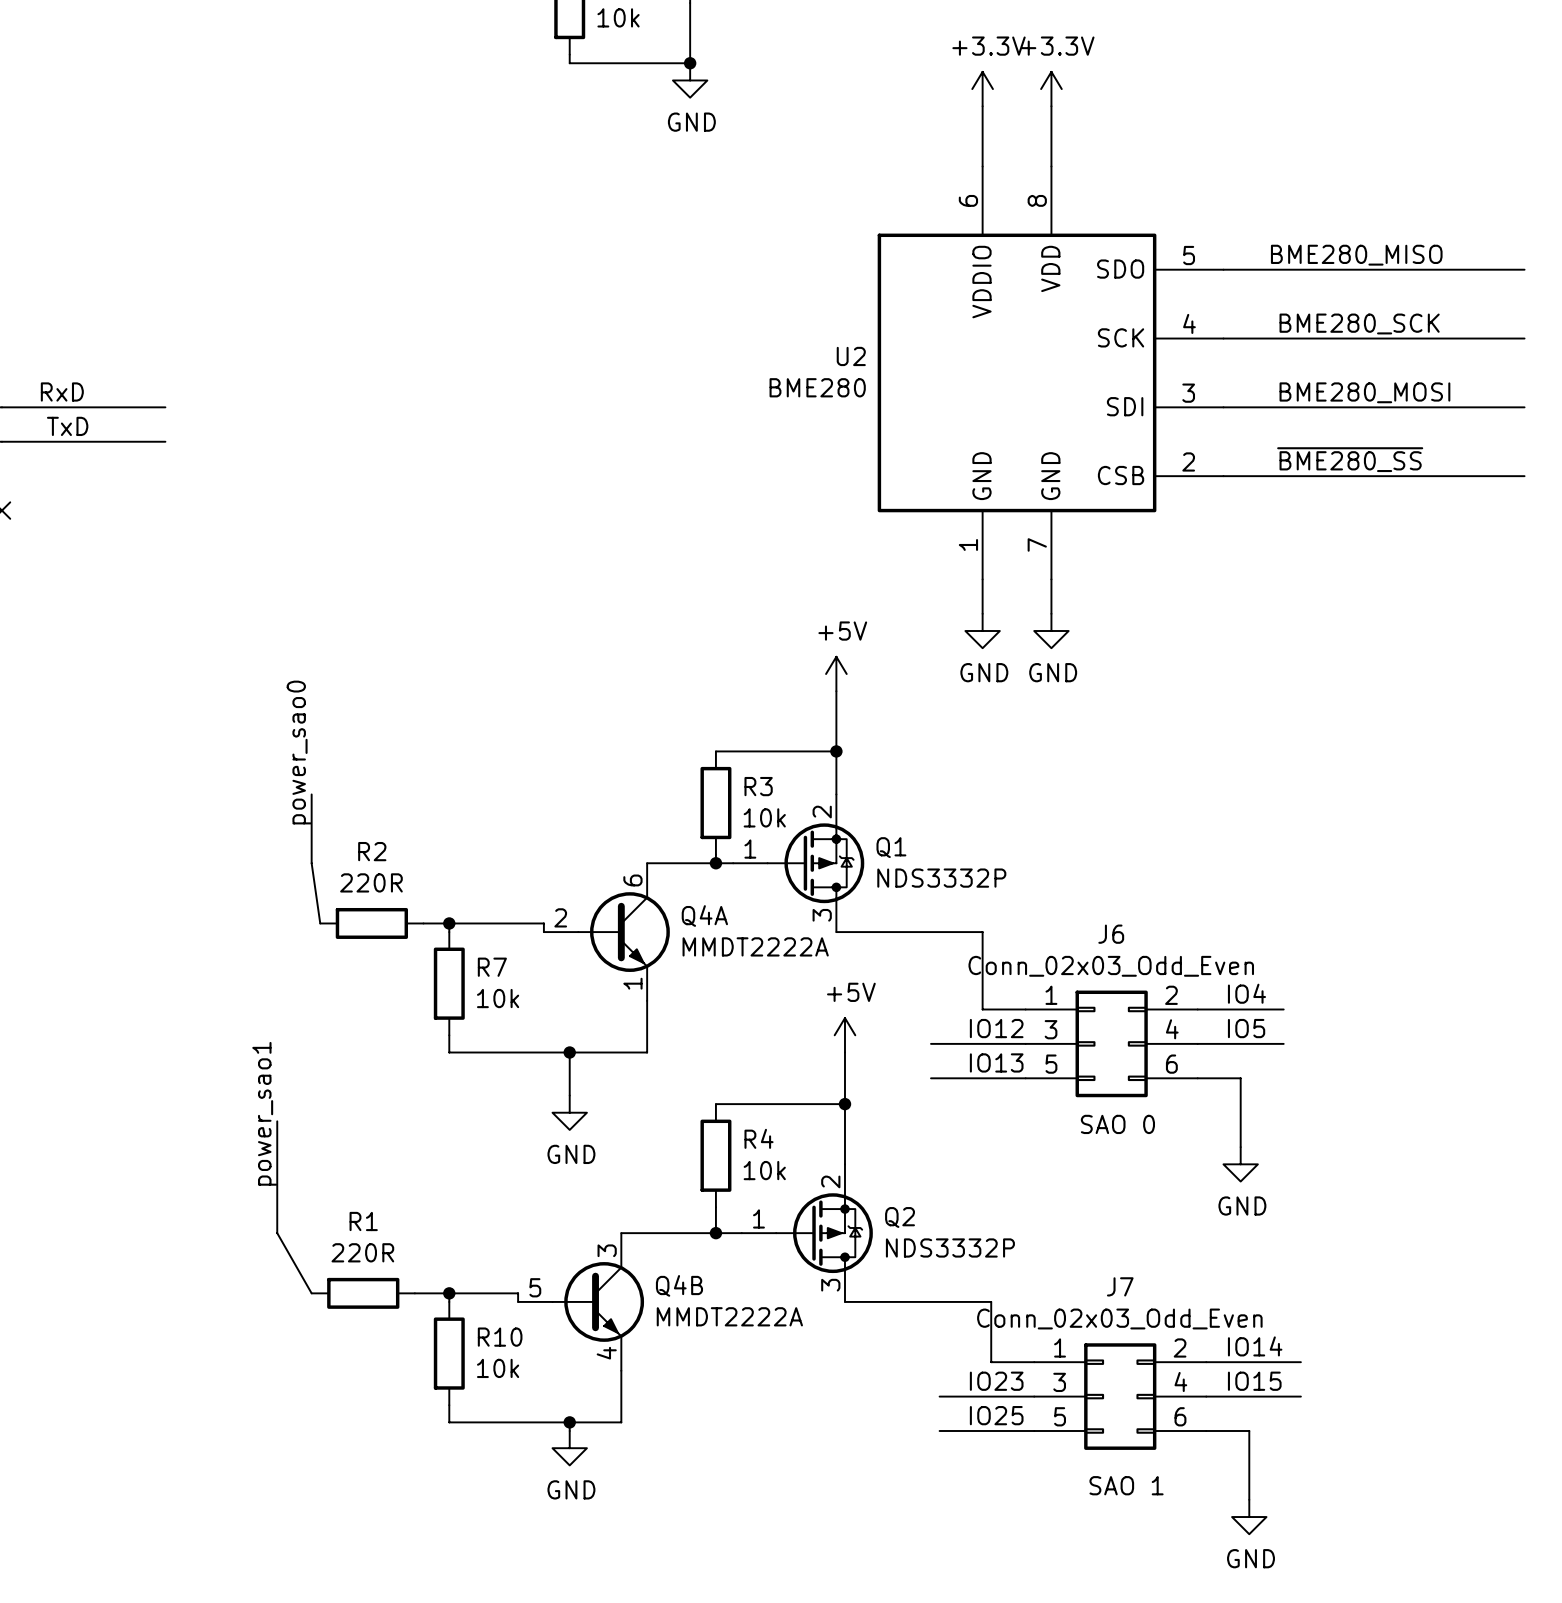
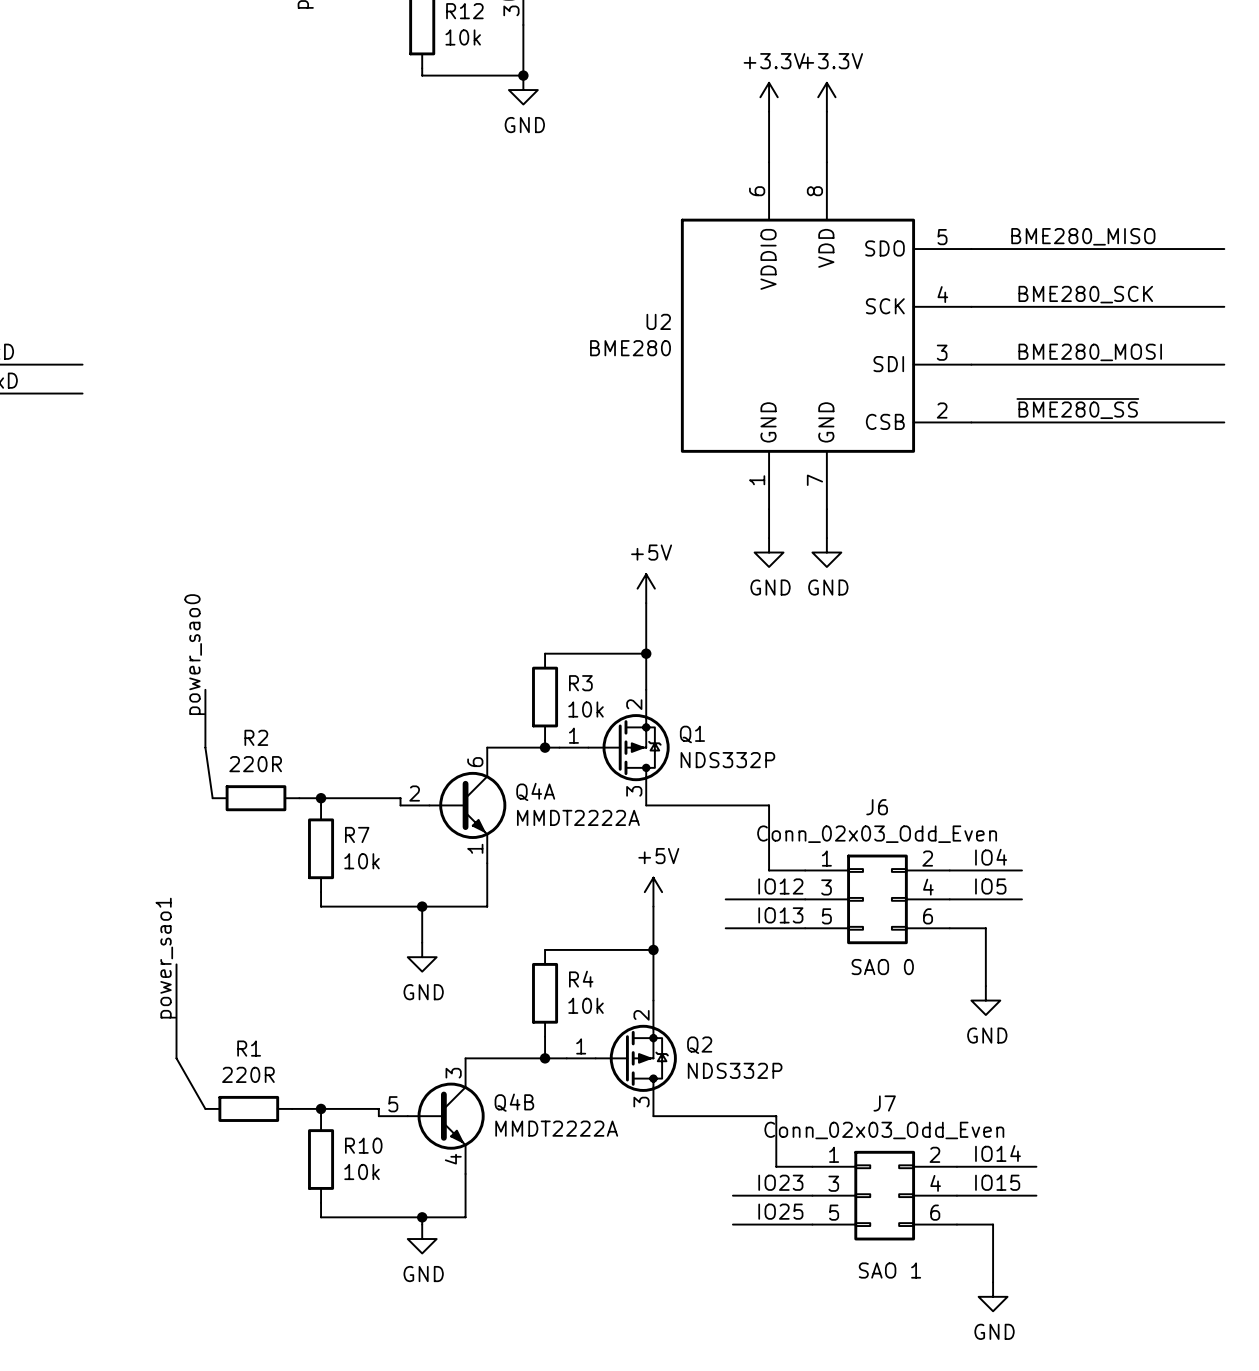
Q1 value: NDS3332P (941, 878) -> NDS332P (727, 760)
Q2 value: NDS3332P (950, 1247) -> NDS332P (735, 1070)

